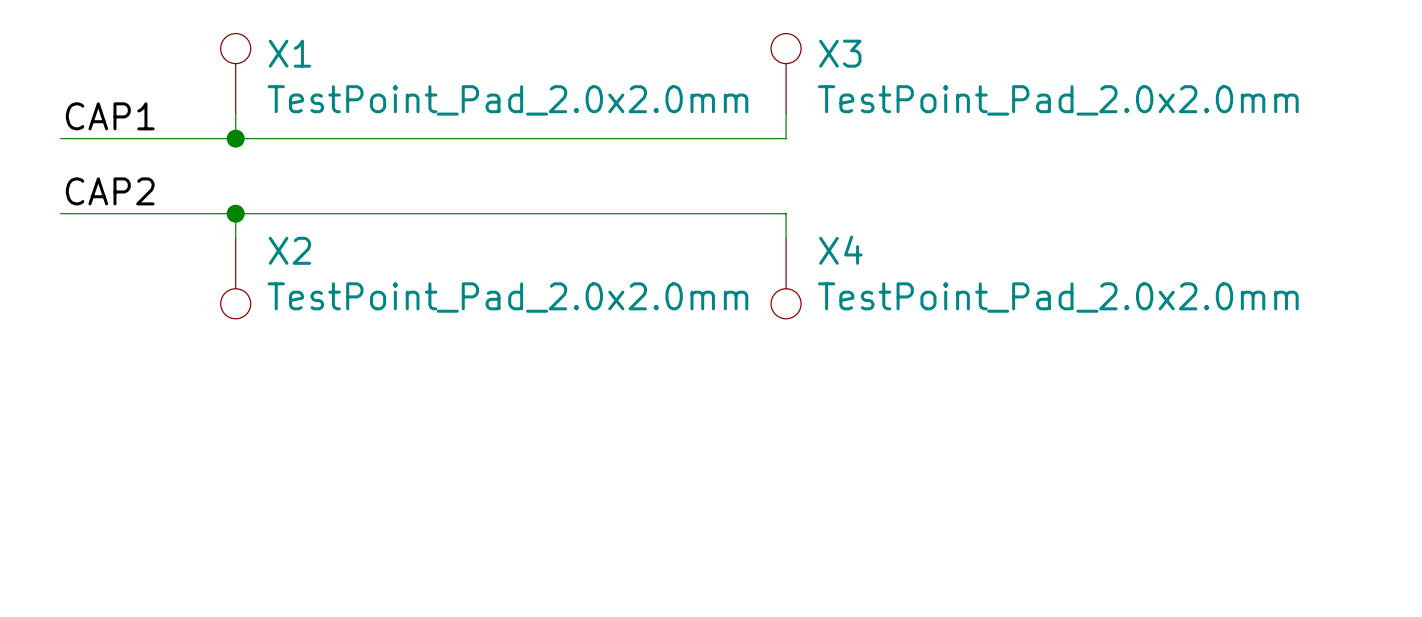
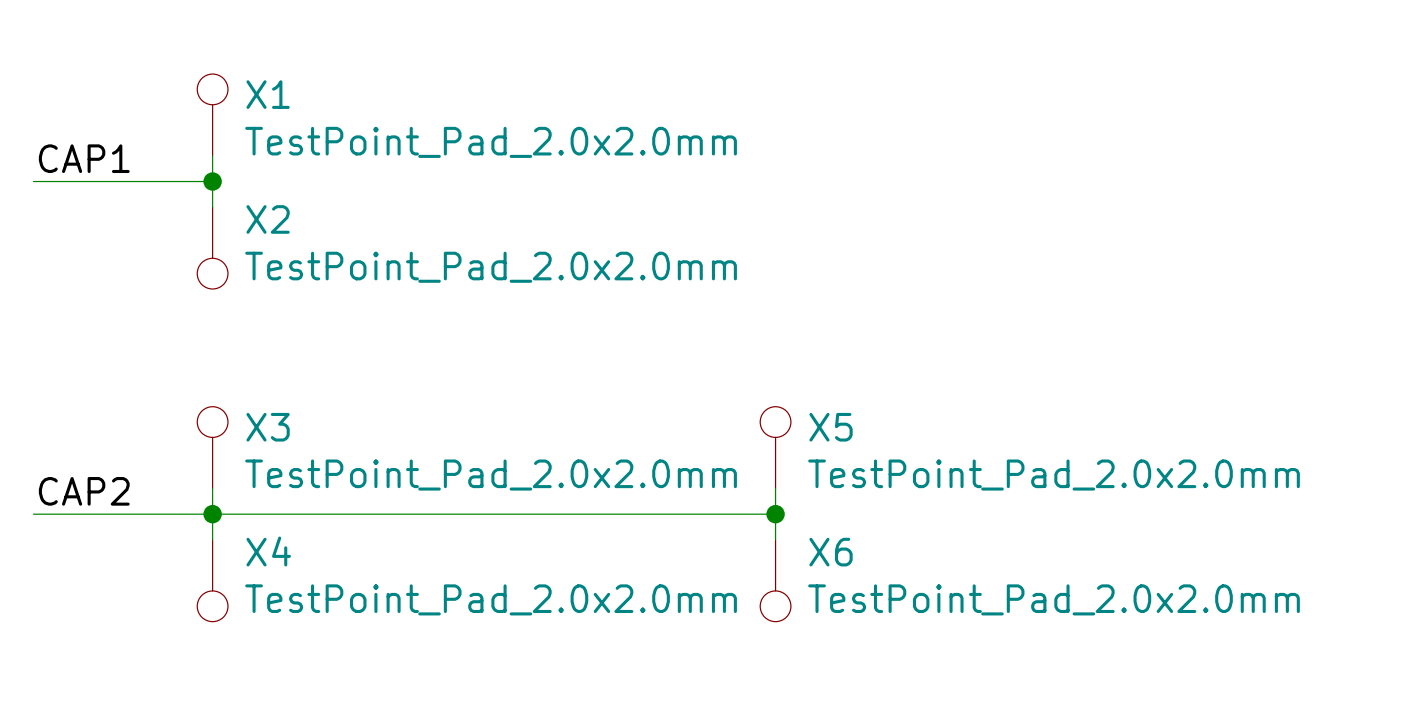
X3 position: (786, 73) -> (212, 447)
wire: (786, 113) (786, 138) (235, 138) -> (212, 207) (212, 181)
label position: CAP2 (110, 191) -> CAP2 (84, 491)
wire: (60, 213) (786, 213) (786, 238) -> none
wire: (235, 213) (235, 238) -> none
junction: (235, 213) -> none
X2 position: (235, 278) -> (212, 248)
X4 position: (786, 278) -> (212, 580)
X5: none -> TestPoint_Pad_2.0x2.0mm (775, 447)
wire: none -> (212, 488) (212, 539)
wire: none -> (775, 488) (775, 539)
wire: none -> (33, 514) (775, 514)
junction: none -> (212, 514)
junction: none -> (775, 514)
X6: none -> TestPoint_Pad_2.0x2.0mm (775, 580)

